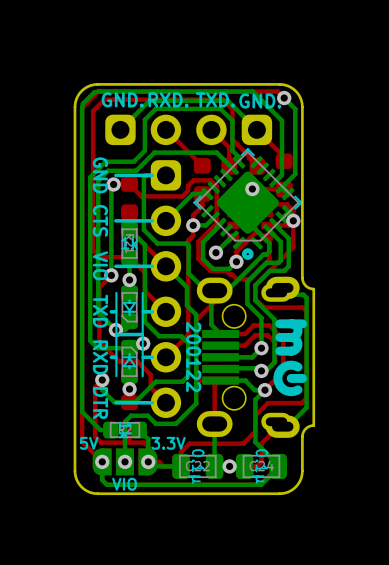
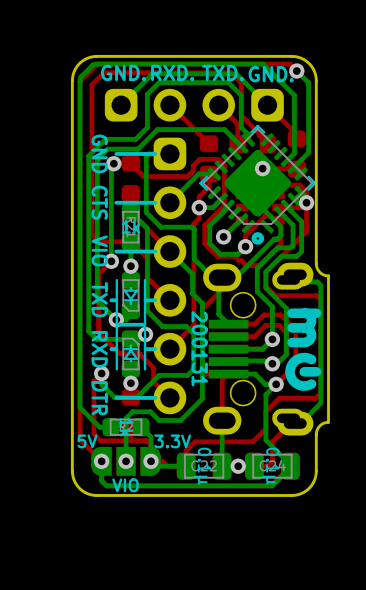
text: 200122 (193, 356) -> 200131 (199, 348)

